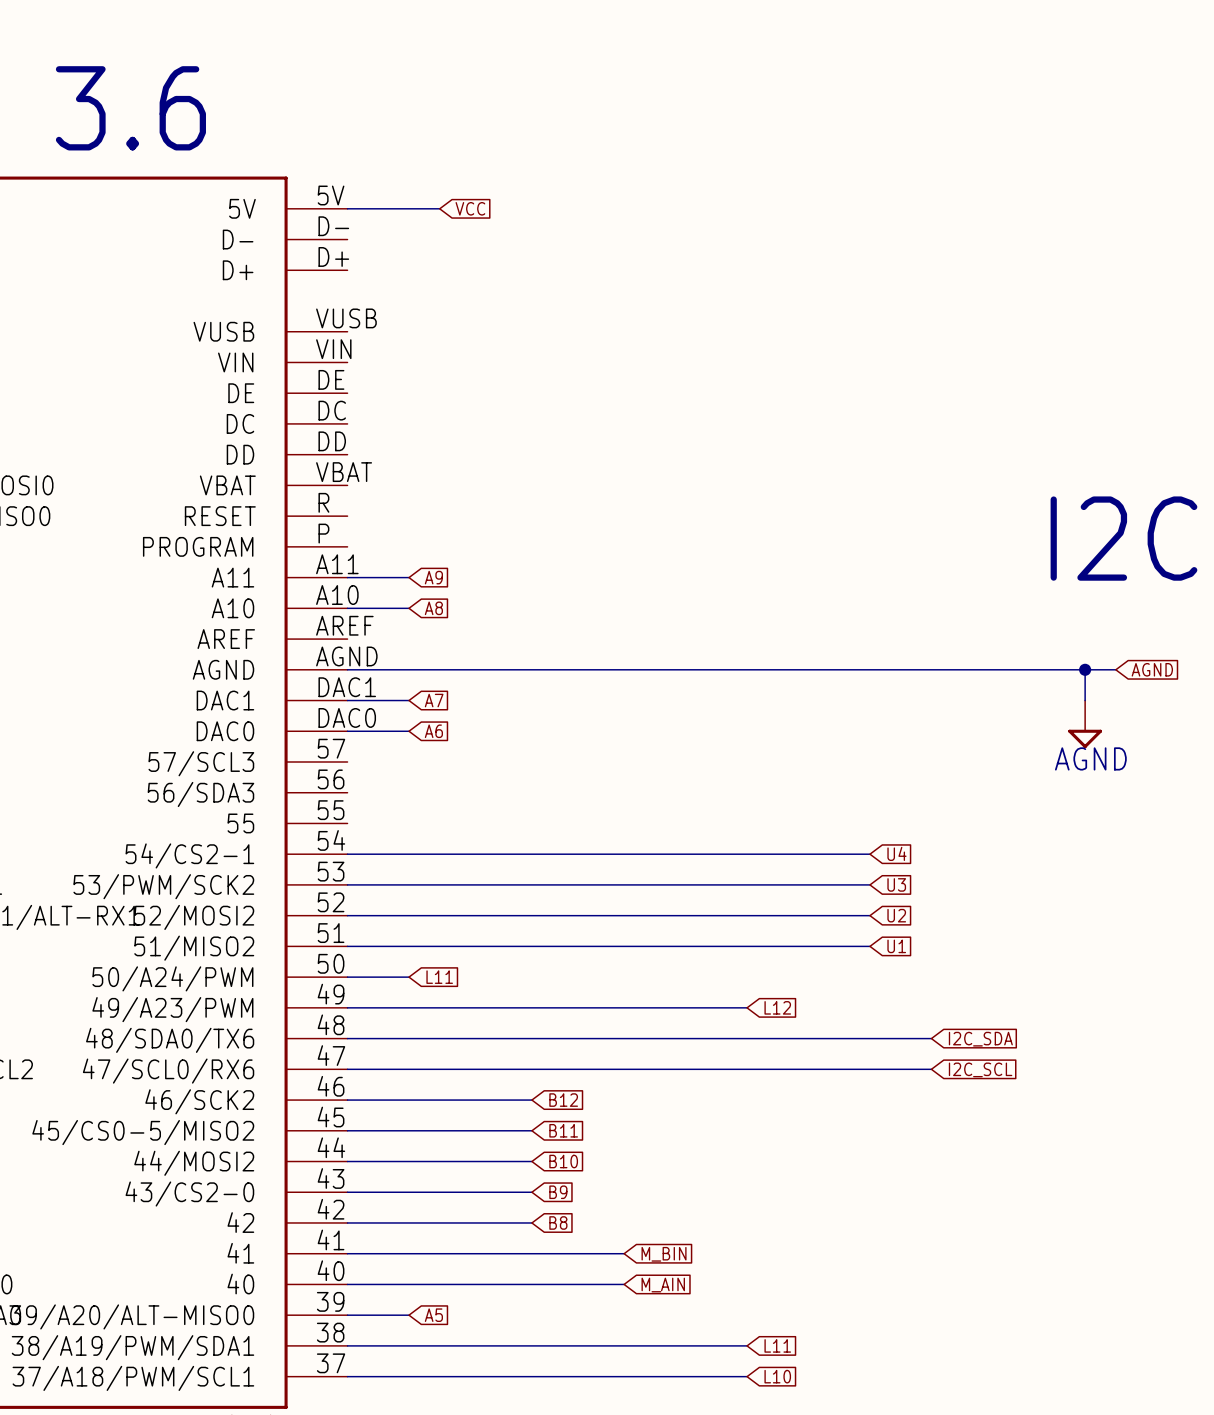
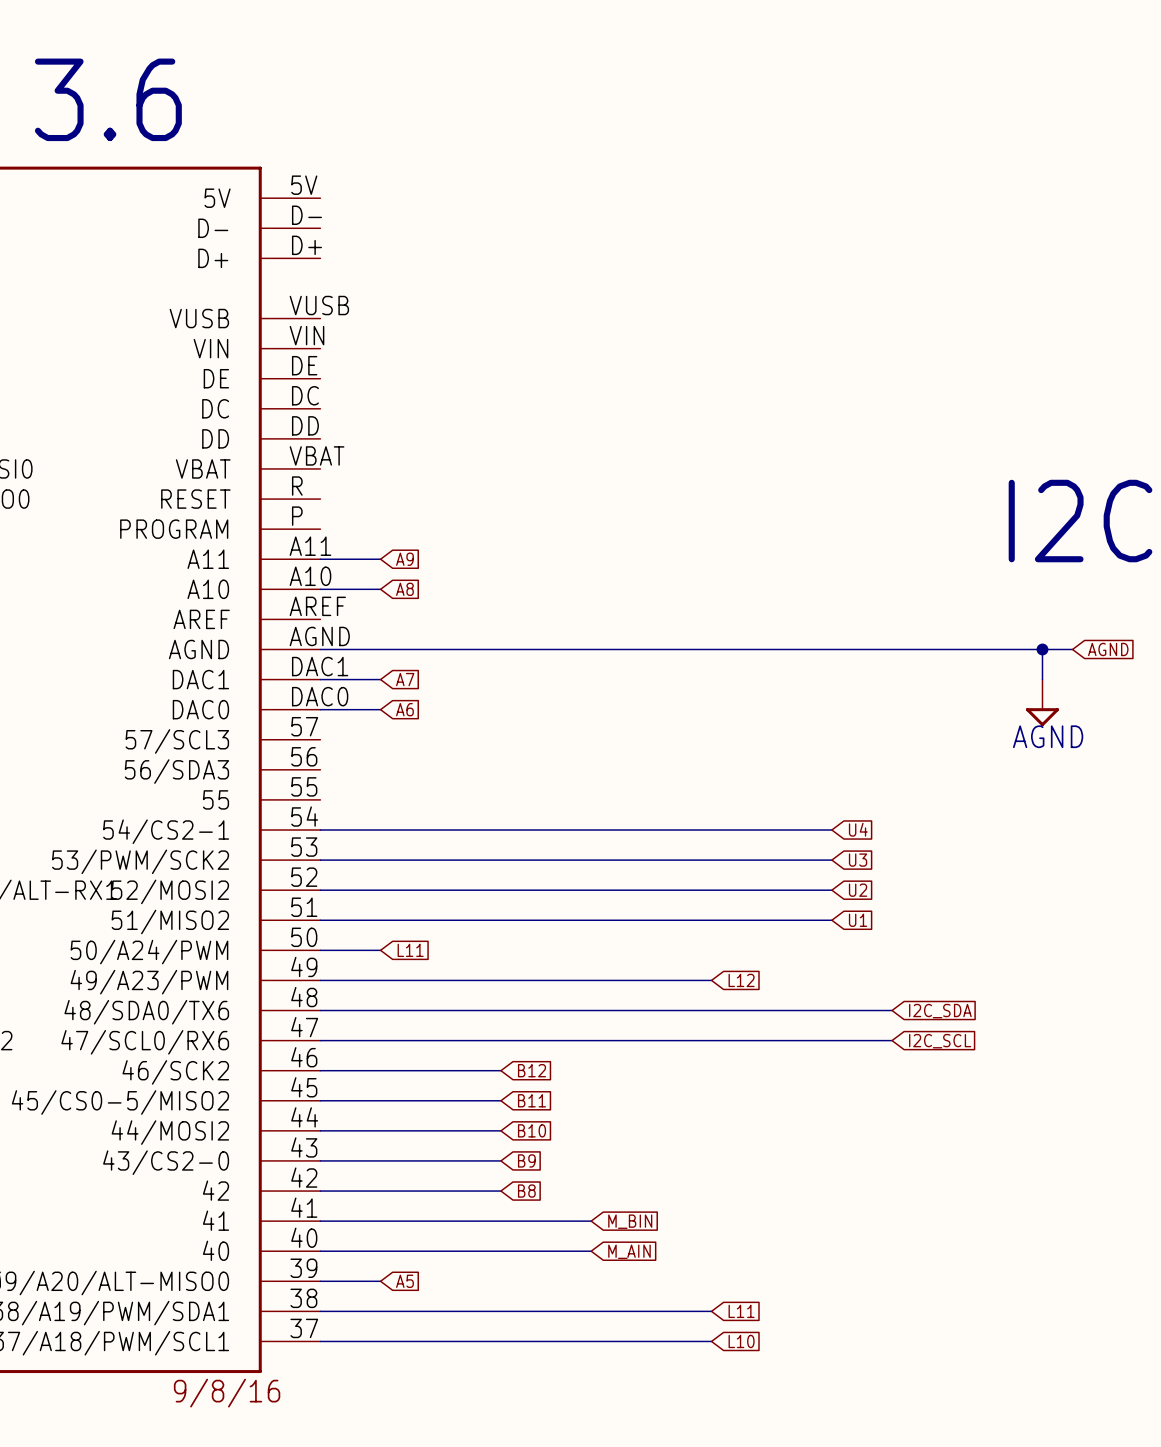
wire: (347, 208) (439, 208) -> none
global label: VCC (470, 208) -> none

